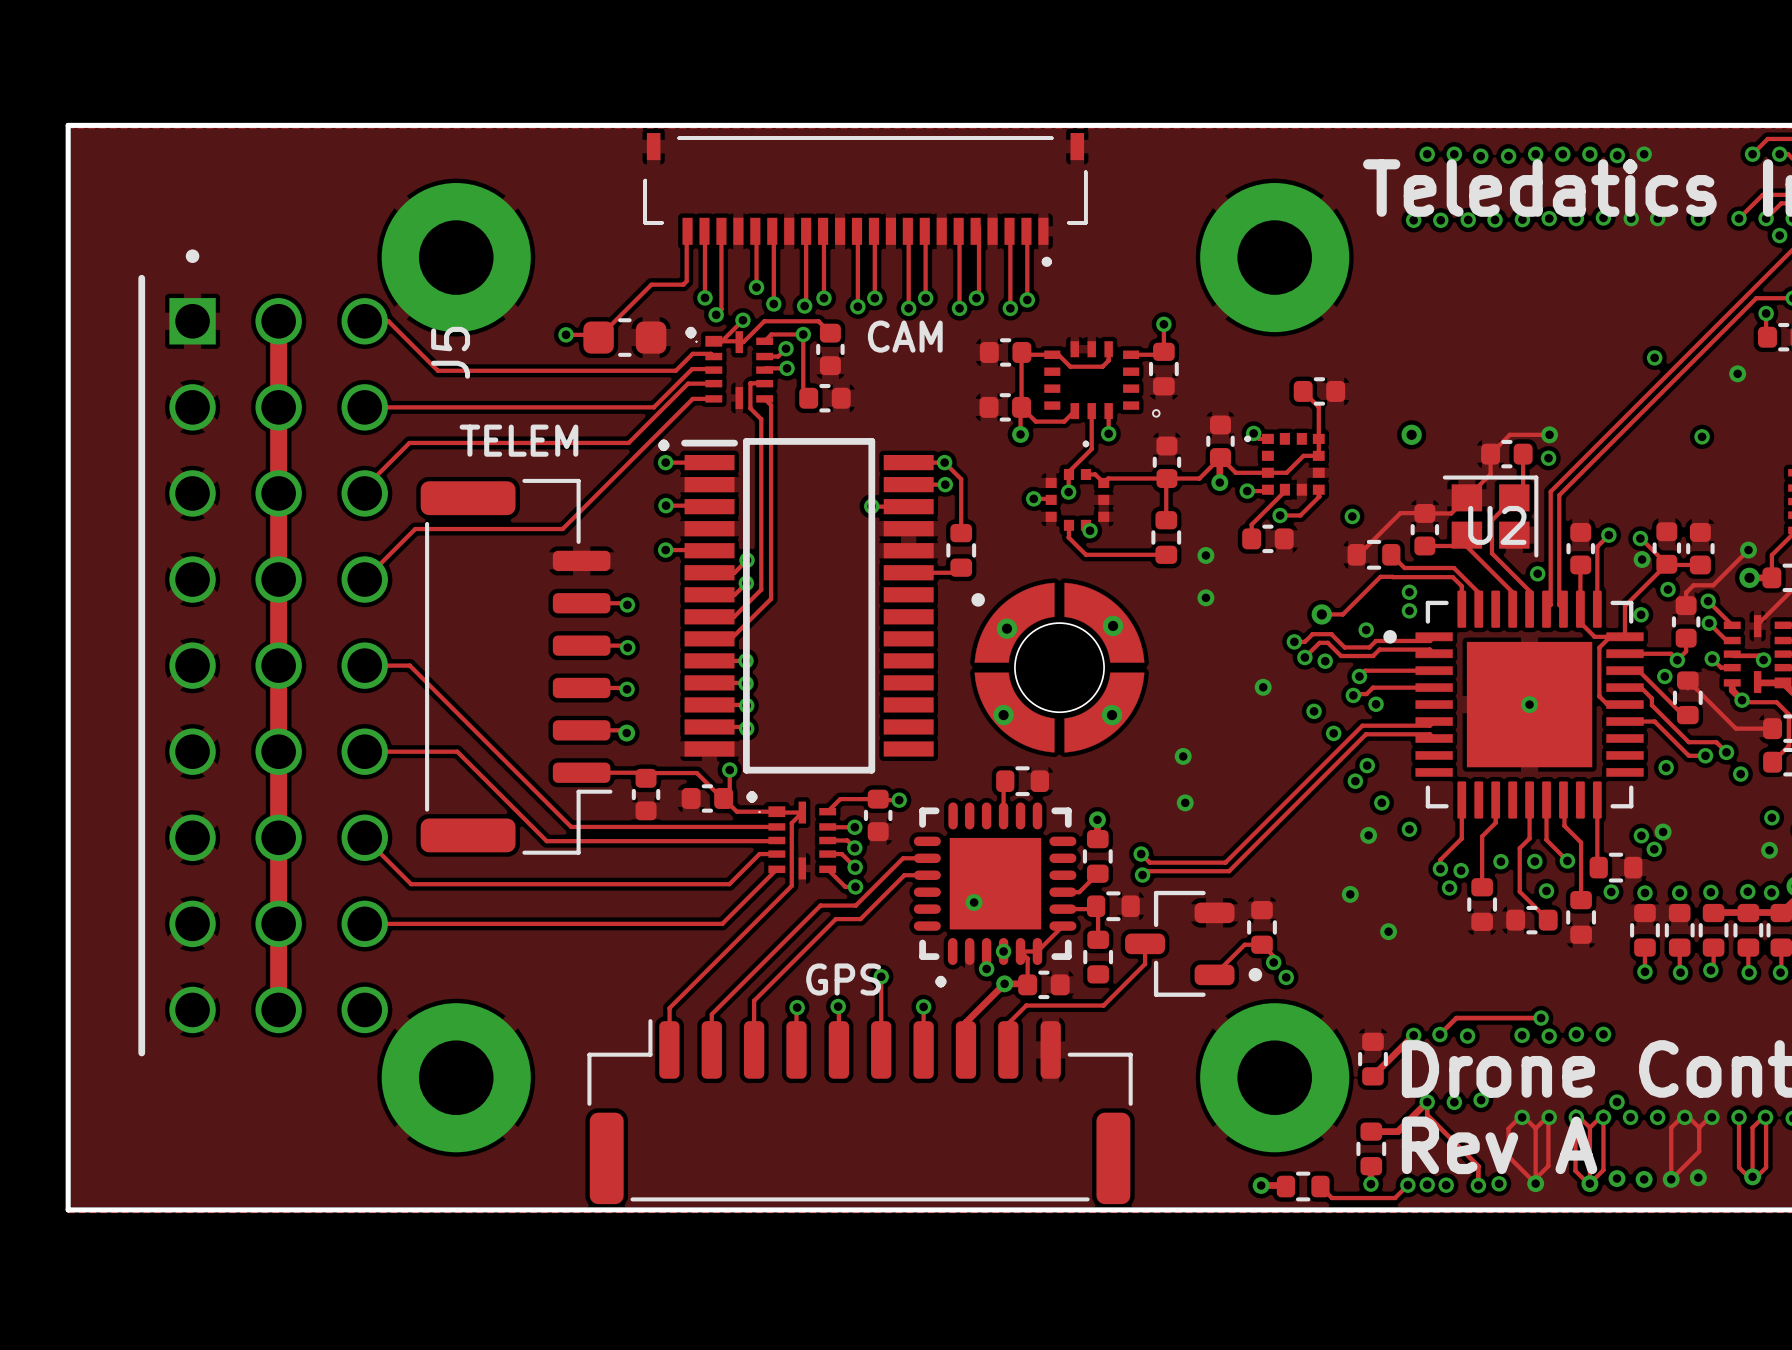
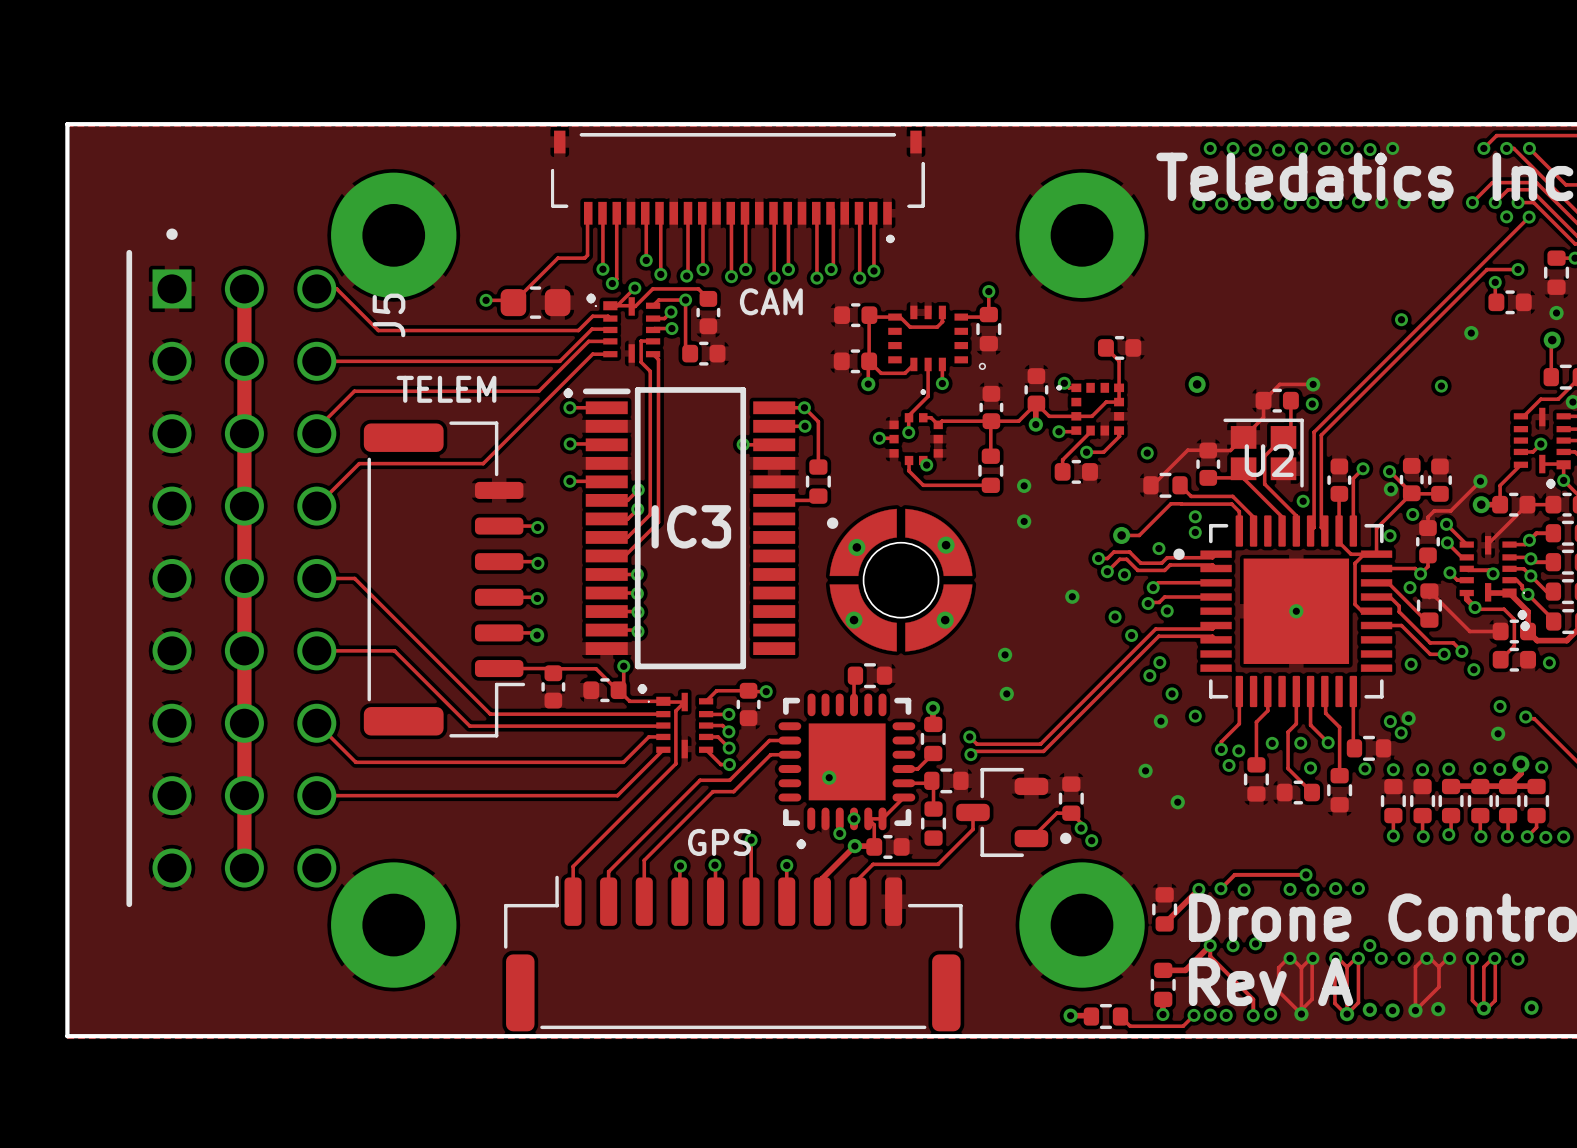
IC3 name: none -> IC3 (691, 526)

